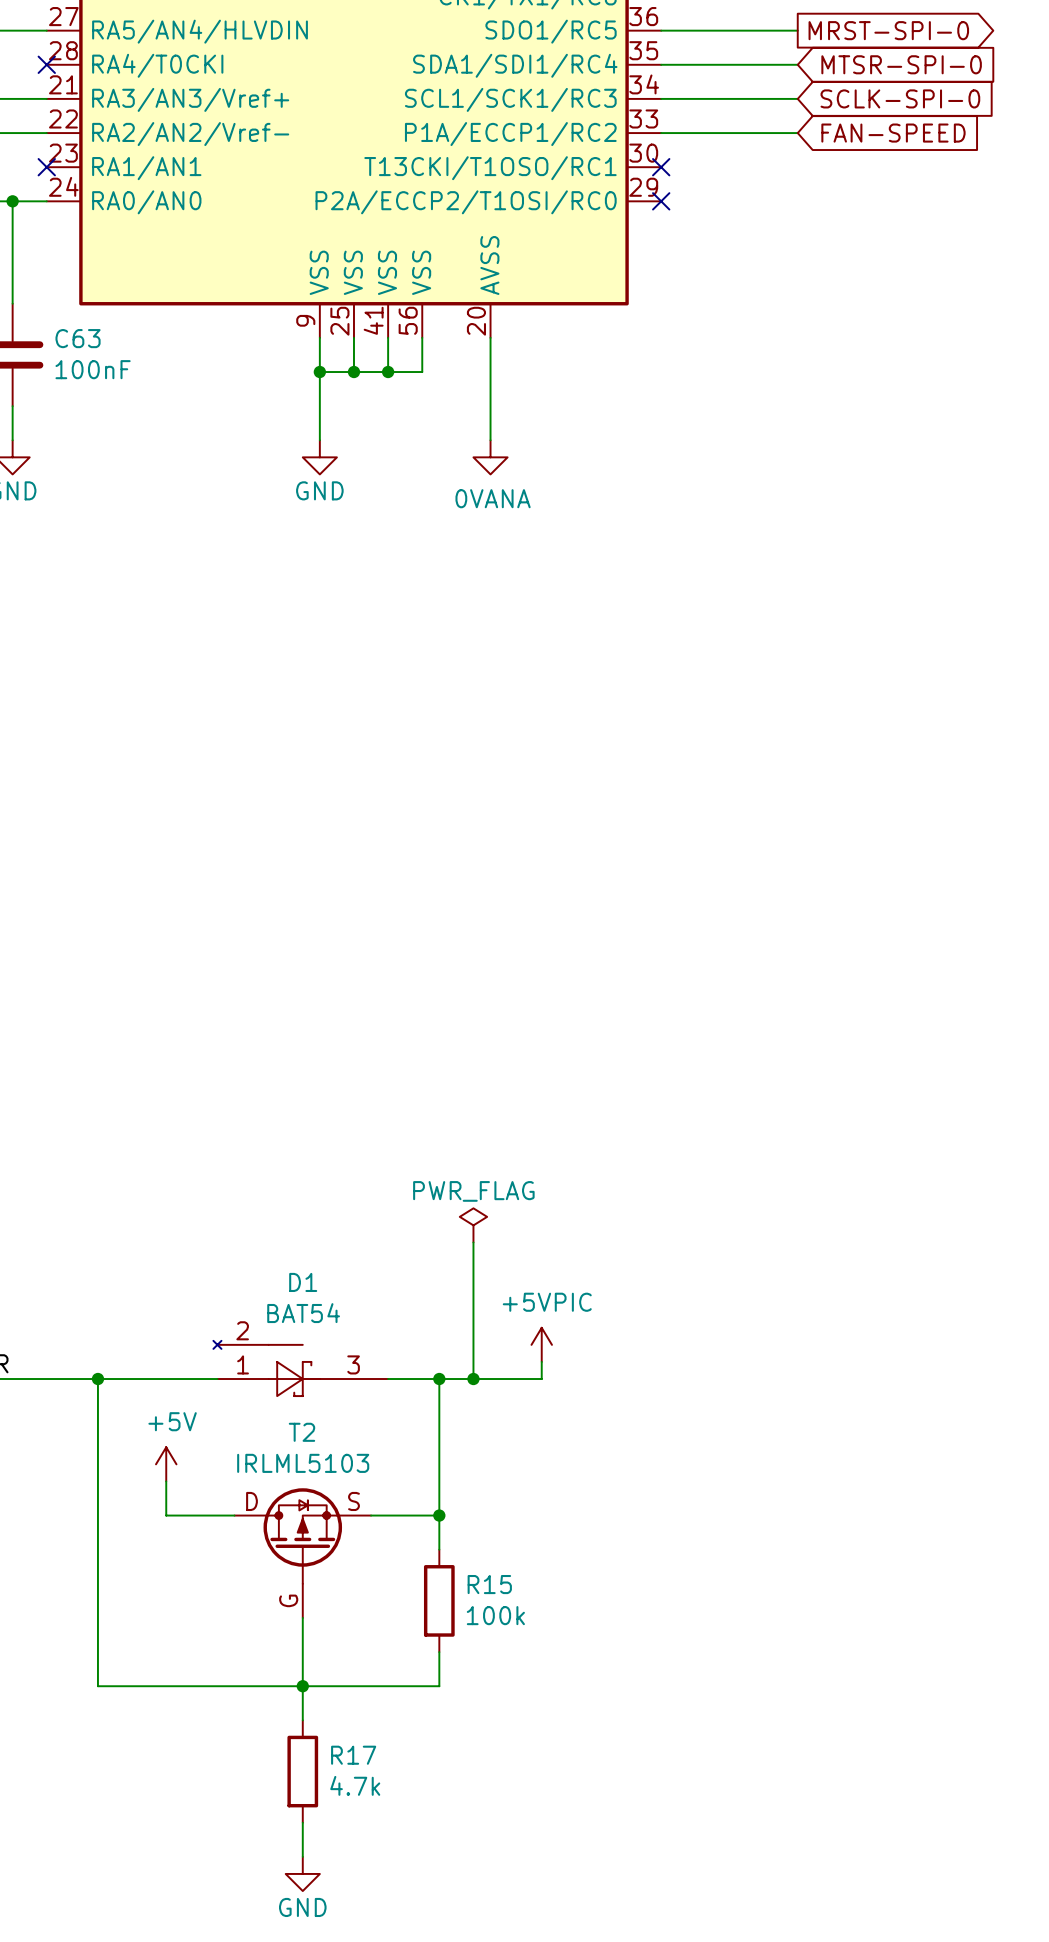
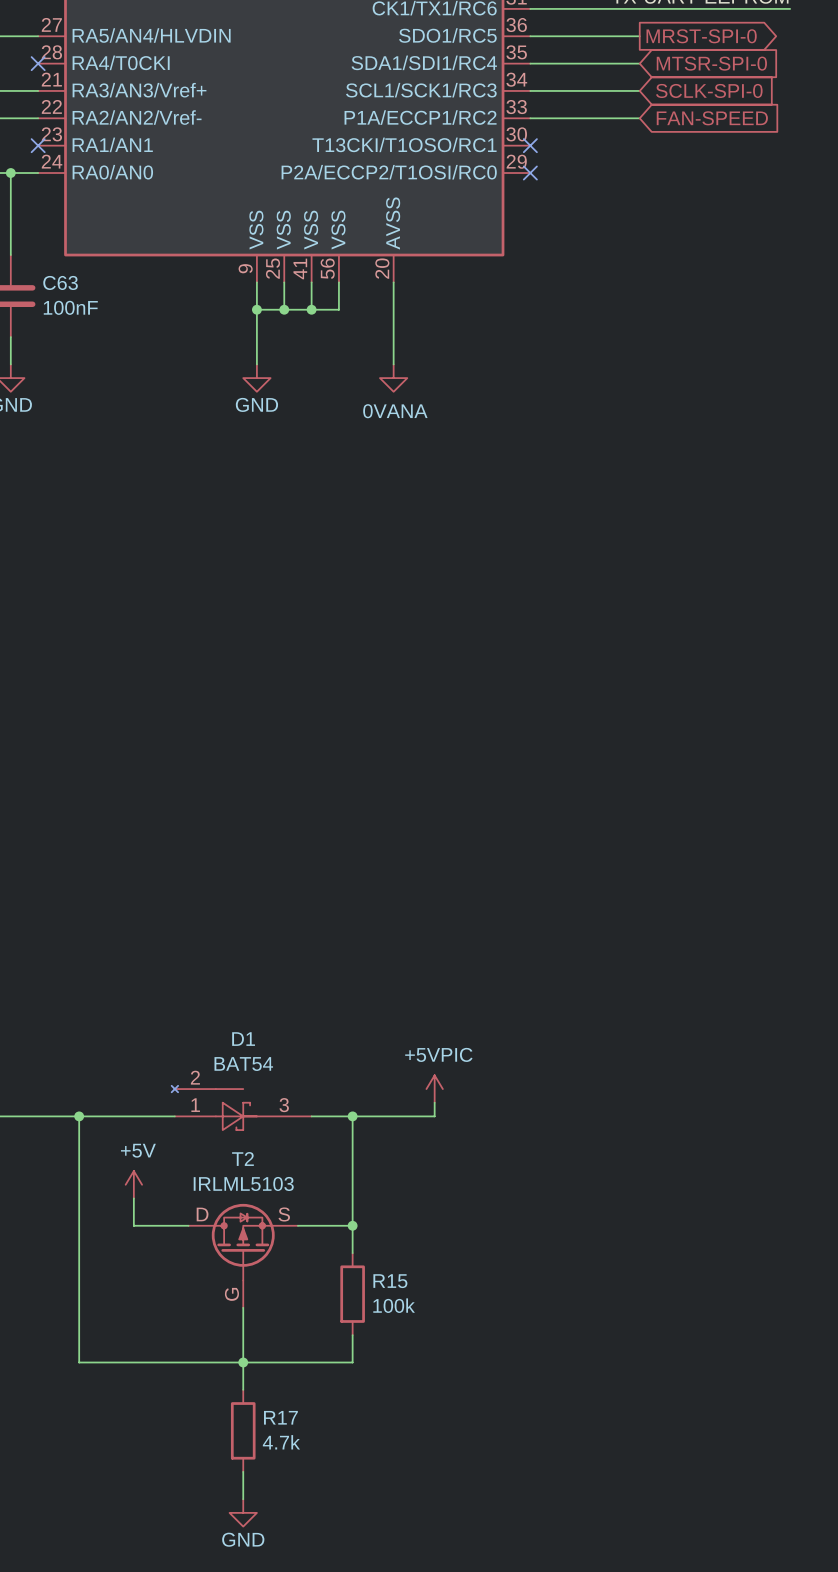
power symbol: PWR_FLAG (473, 1225) -> none
wire: (473, 1242) (473, 1379) -> none
junction: (473, 1379) -> none

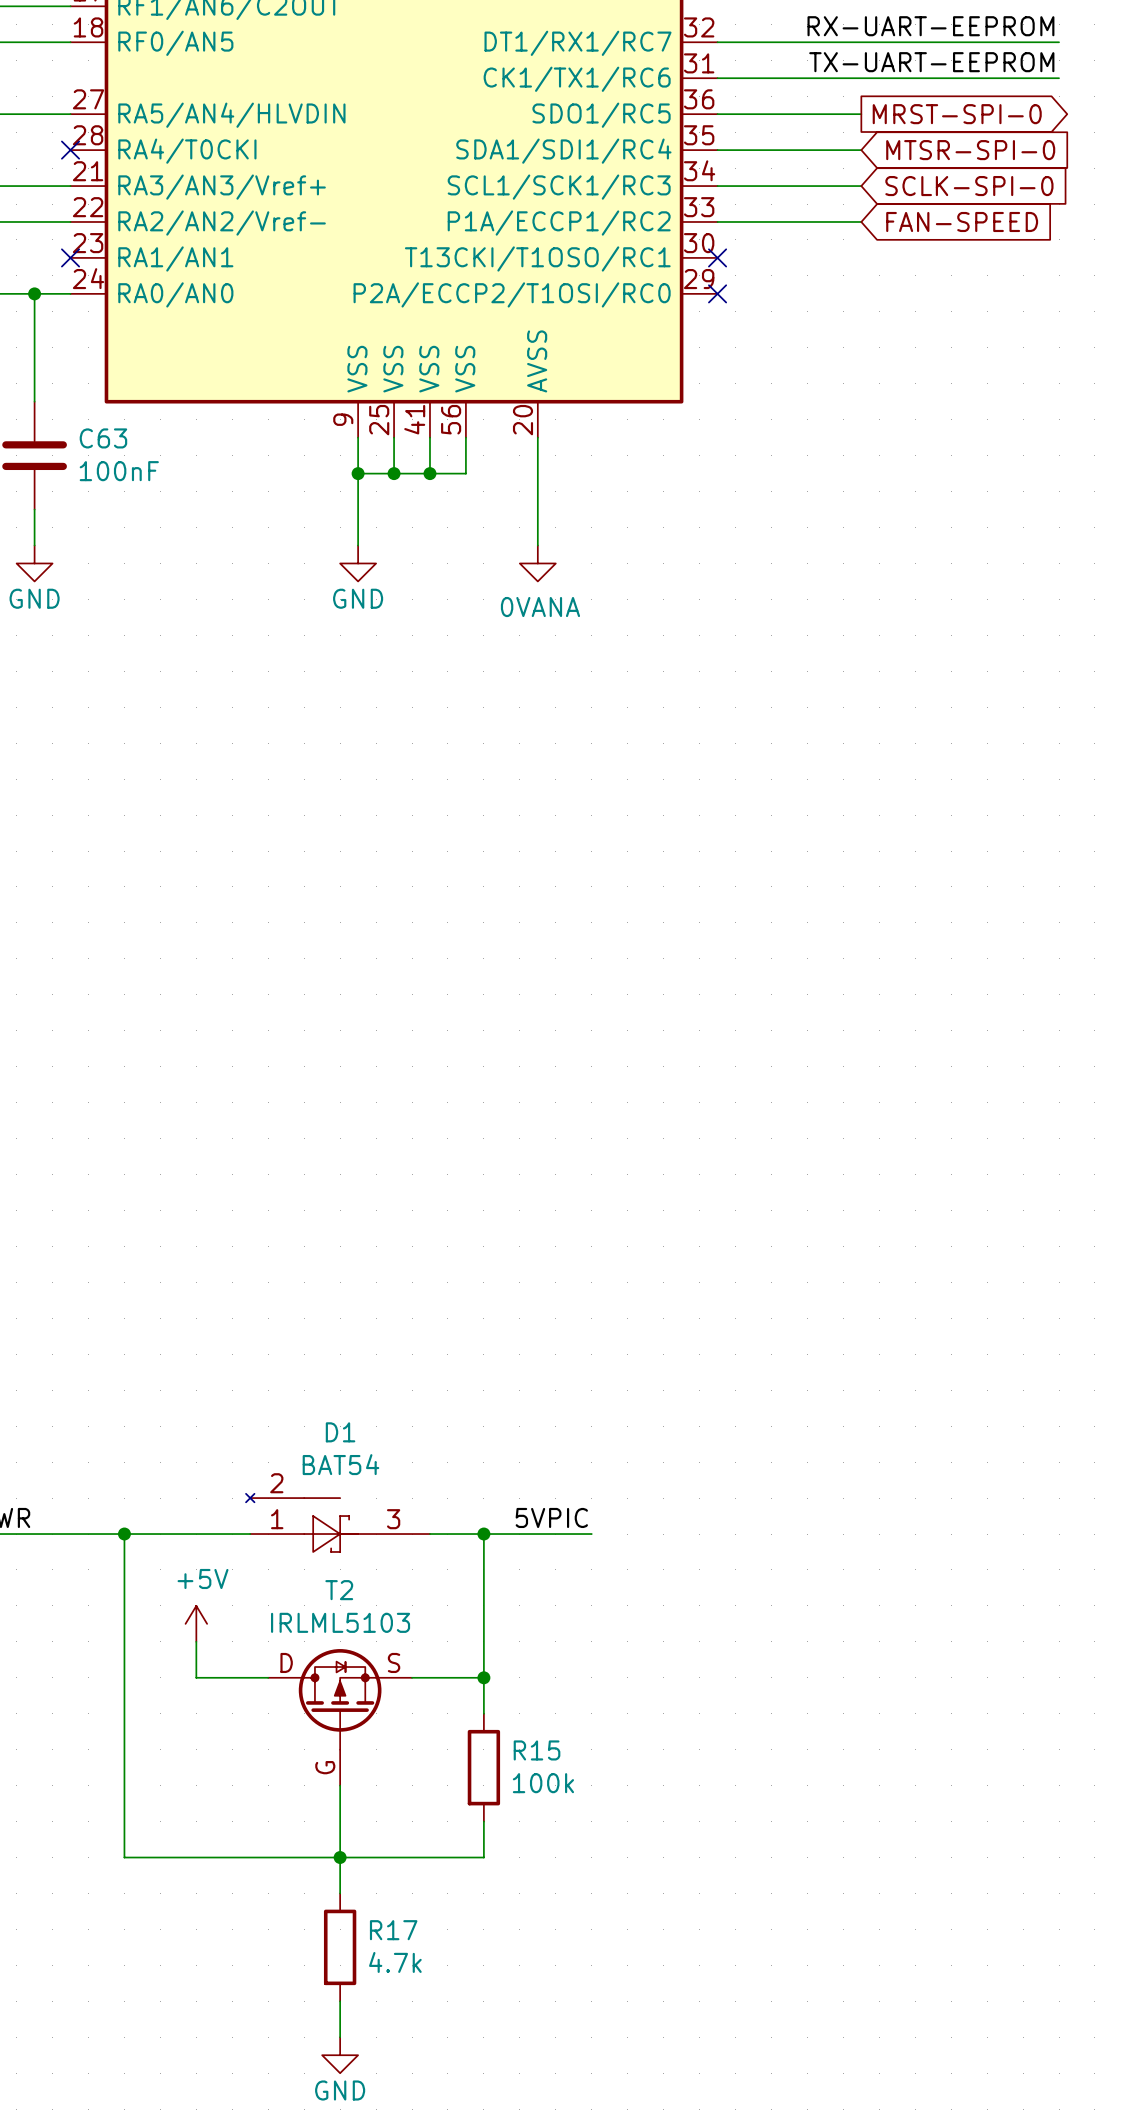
power symbol: +5VPIC (434, 1089) -> none
wire: (434, 1102) (434, 1116) -> none
label: none -> 5VPIC (551, 1517)

